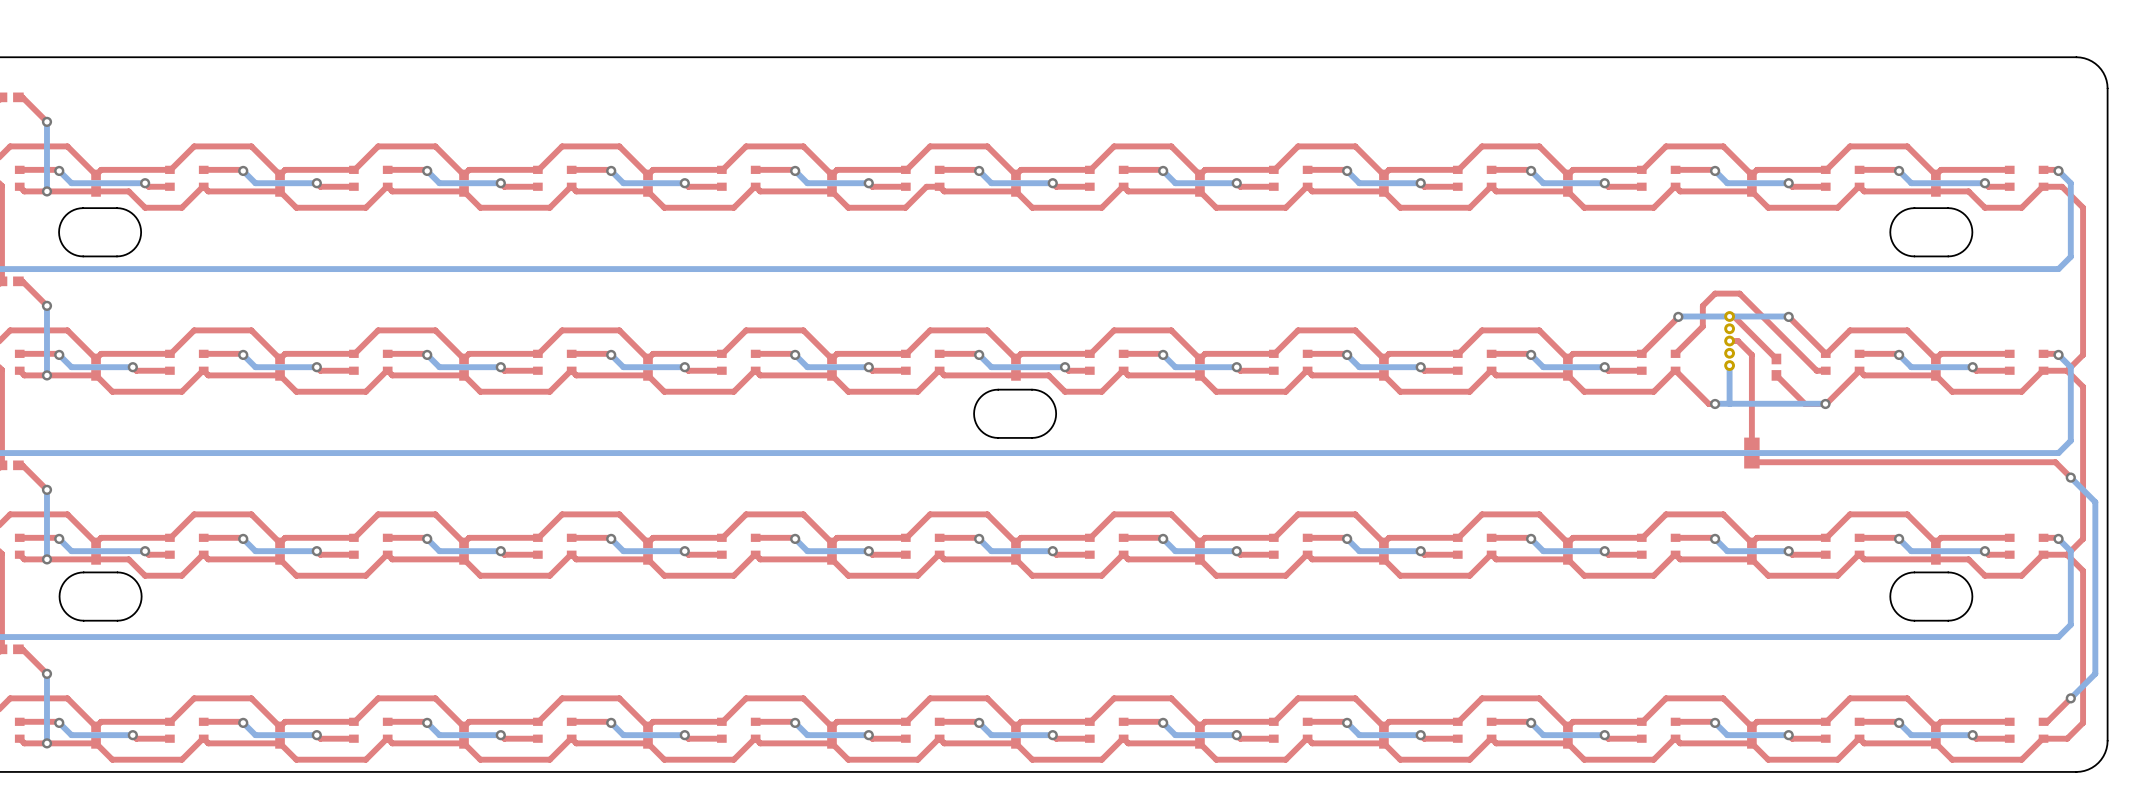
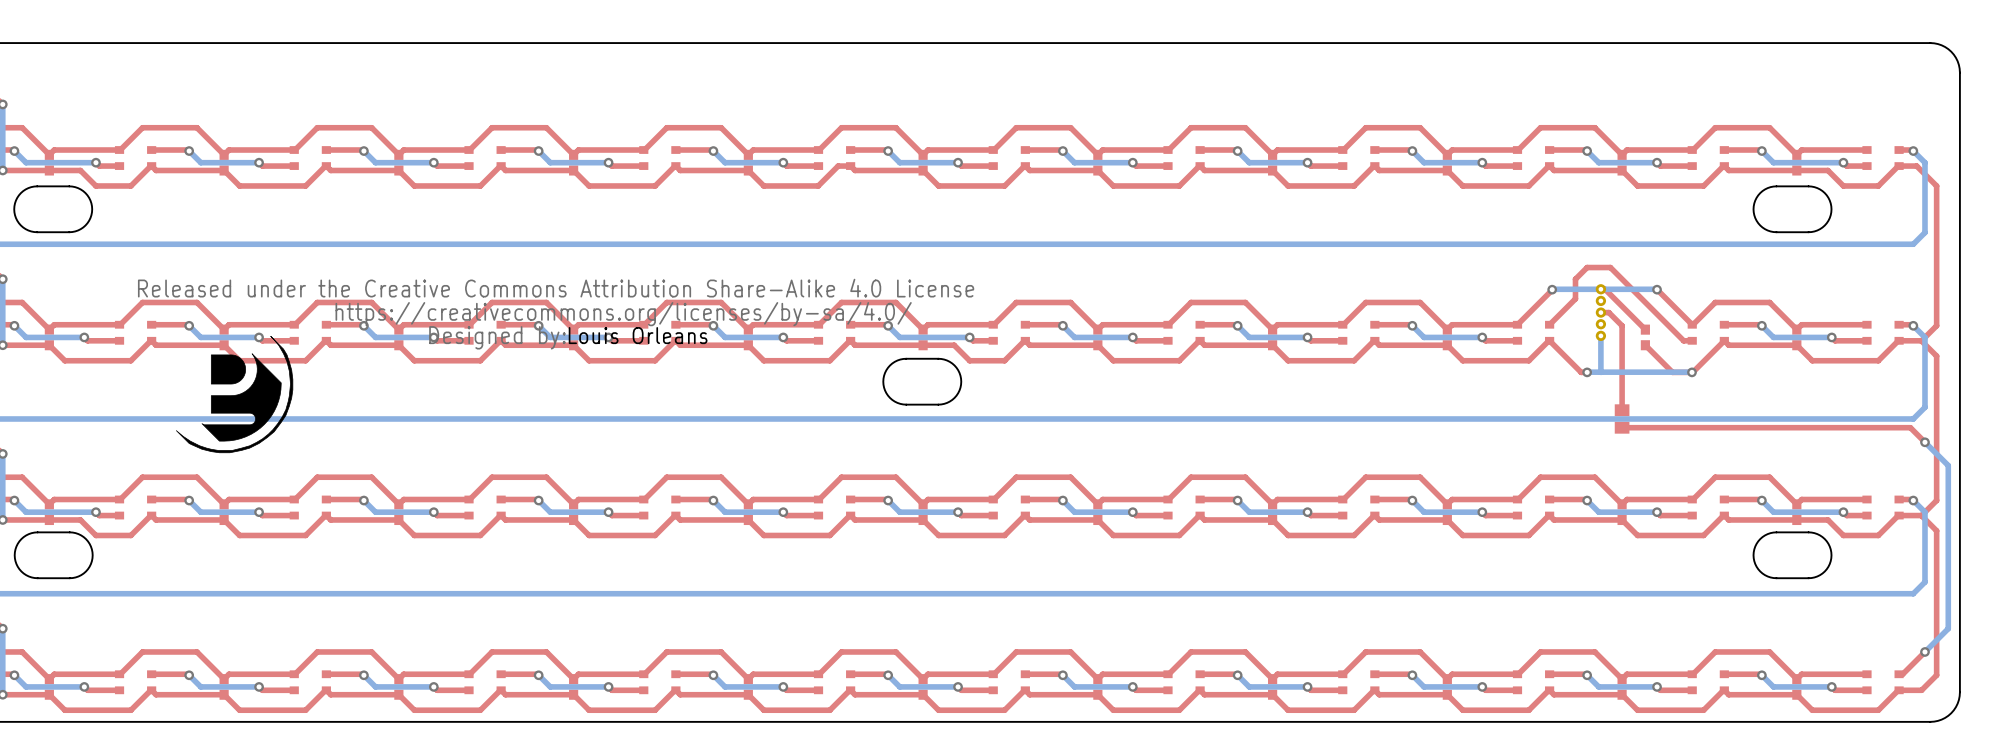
drawing: none -> [176, 335, 294, 454]
text: none -> Louis Orleans (638, 335)

